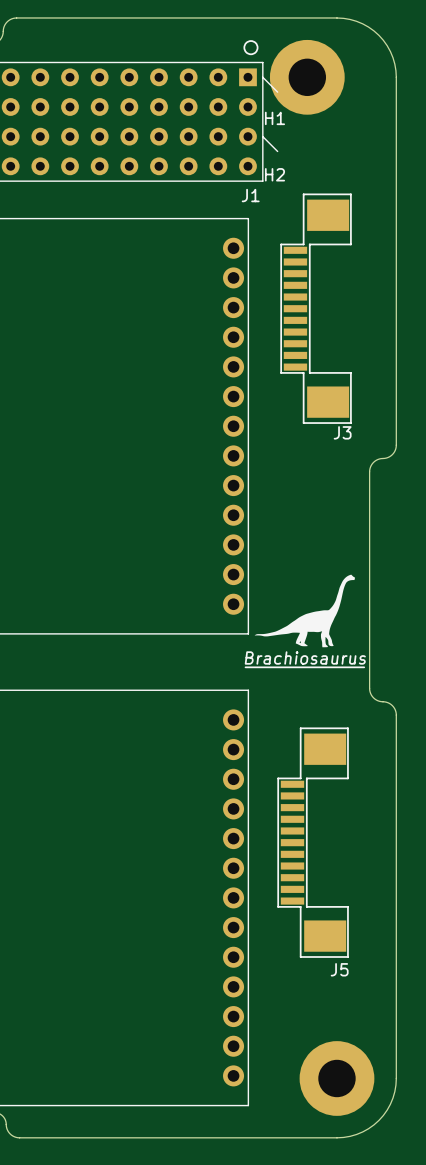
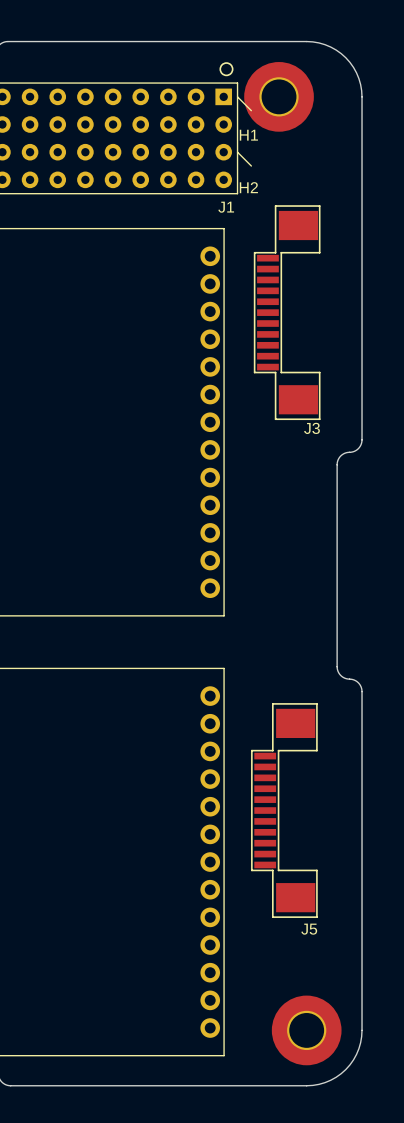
drawing: [254, 574, 356, 648] -> none
text: Brachiosaurus (305, 657) -> none
line: (245, 667) (364, 667) -> none

